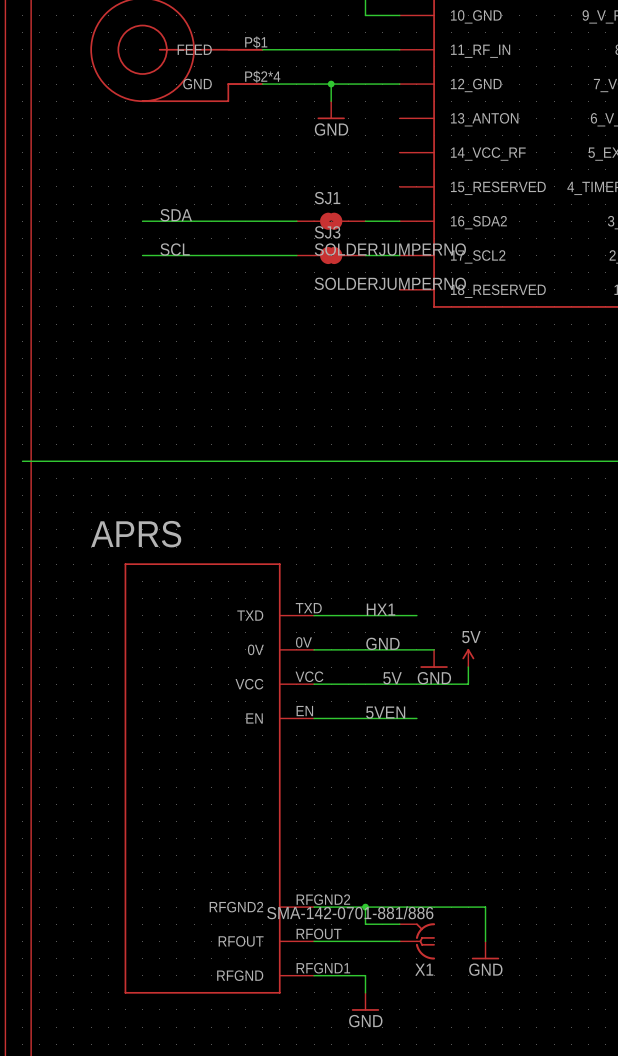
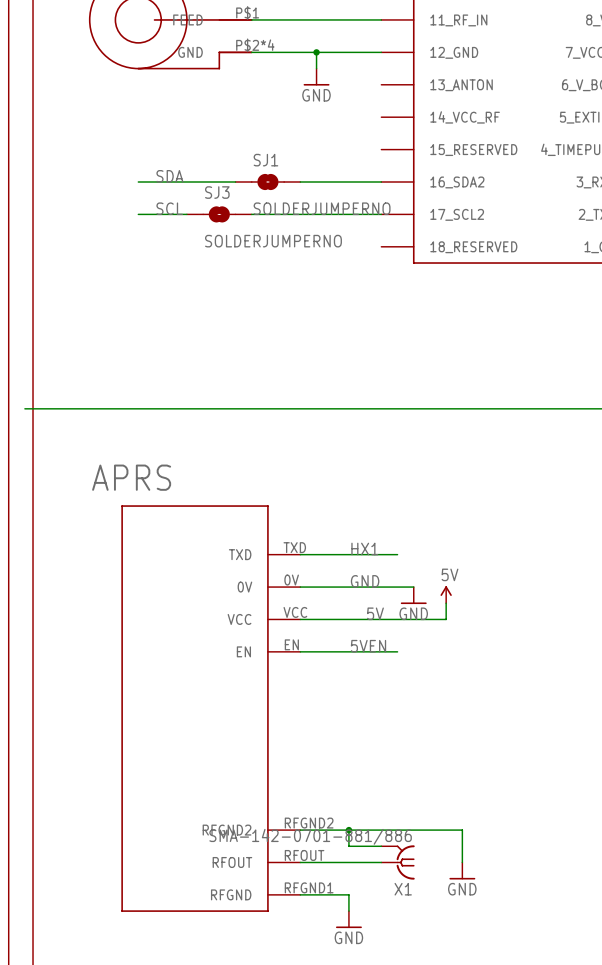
SJ1 position: (331, 221) -> (267, 182)
SJ3 position: (331, 255) -> (219, 214)

